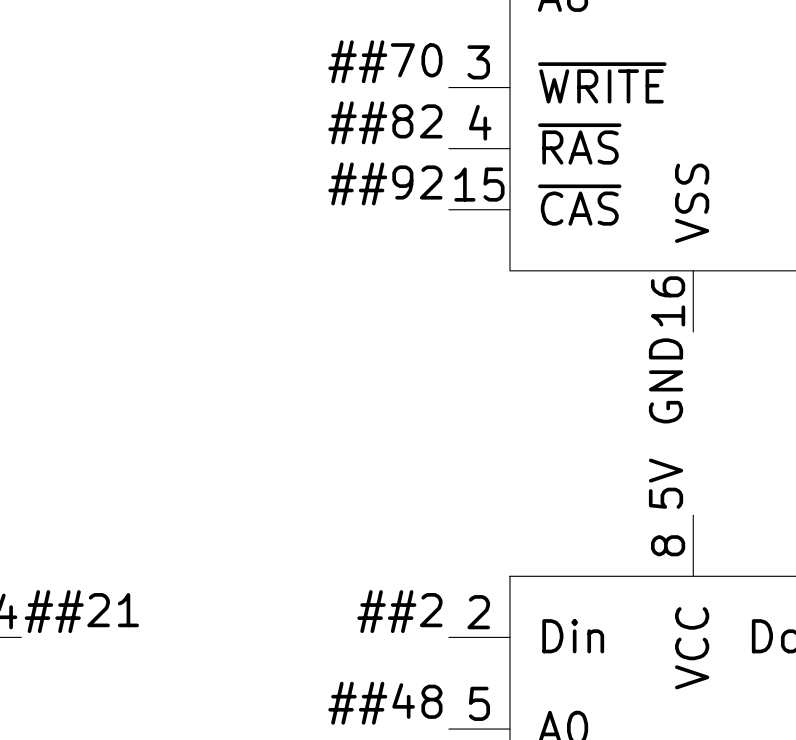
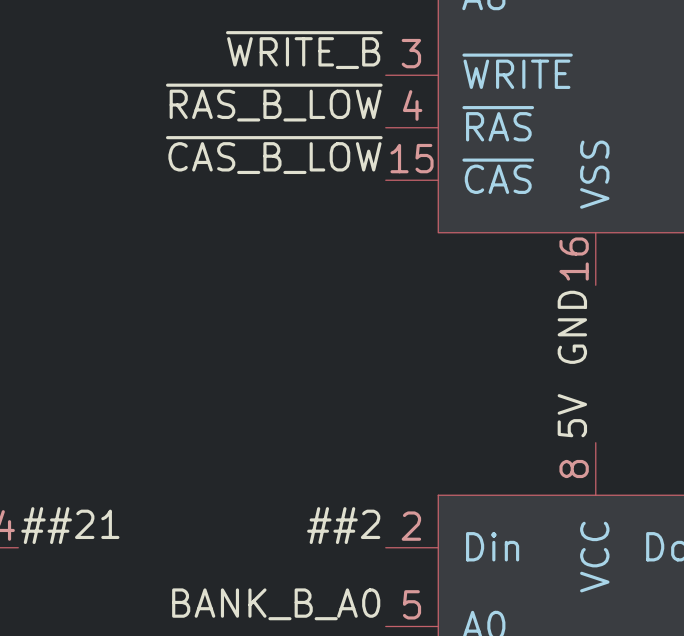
label: ##70 (385, 61) -> ~{WRITE_B} (304, 50)
label: ##82 (385, 122) -> ~{RAS_B_LOW} (274, 102)
label: ##92 (385, 183) -> ~{CAS_B_LOW} (274, 155)
label: ##48 (385, 703) -> BANK_B_A0 (276, 604)

